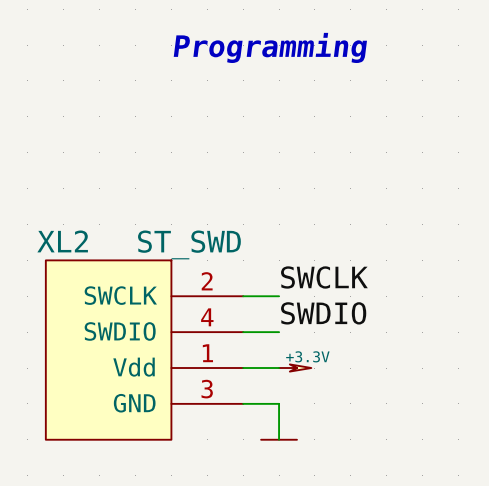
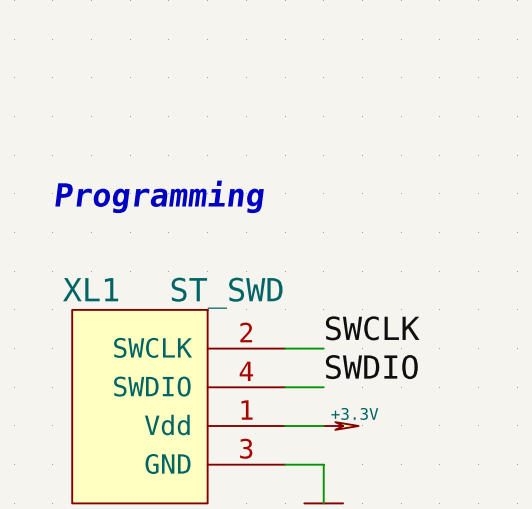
text position: Programming (270, 47) -> Programming (159, 196)
XL2 name: XL2 (62, 241) -> XL1 (90, 289)

